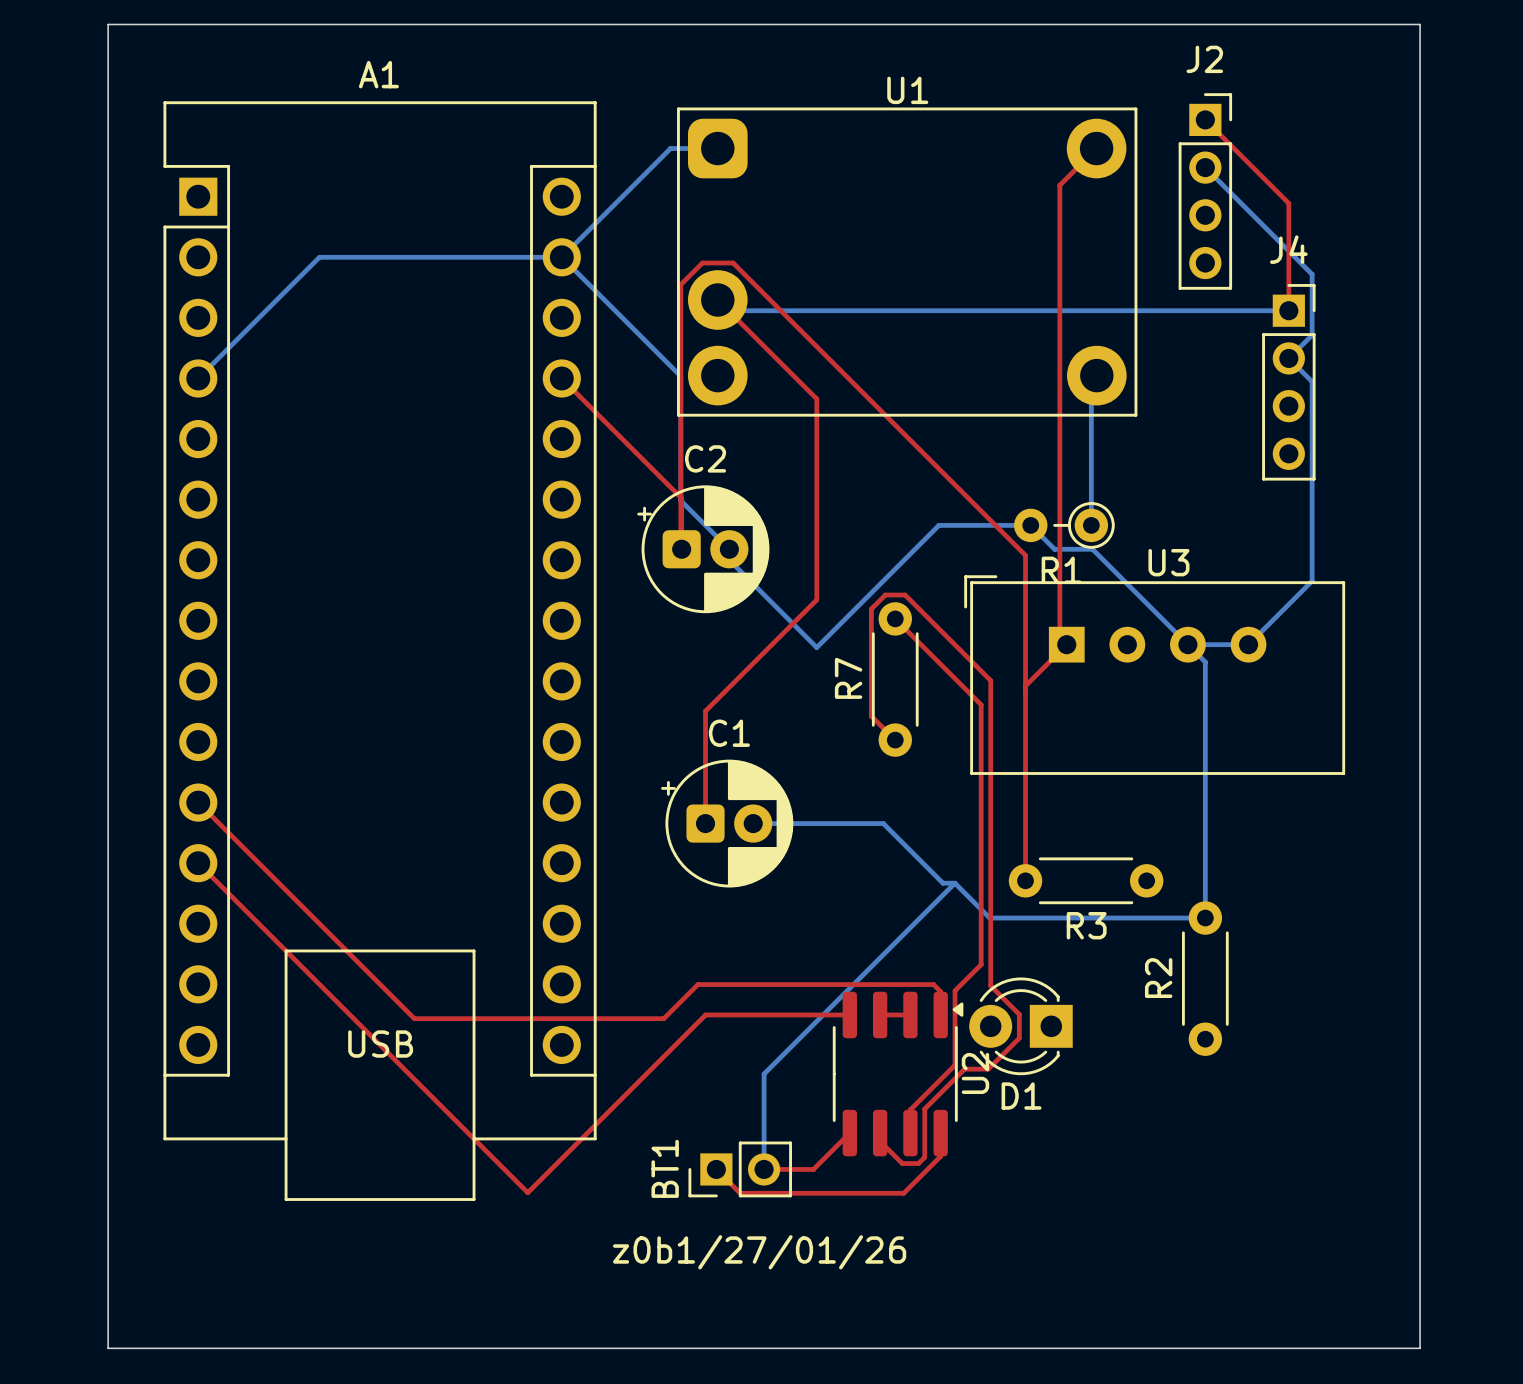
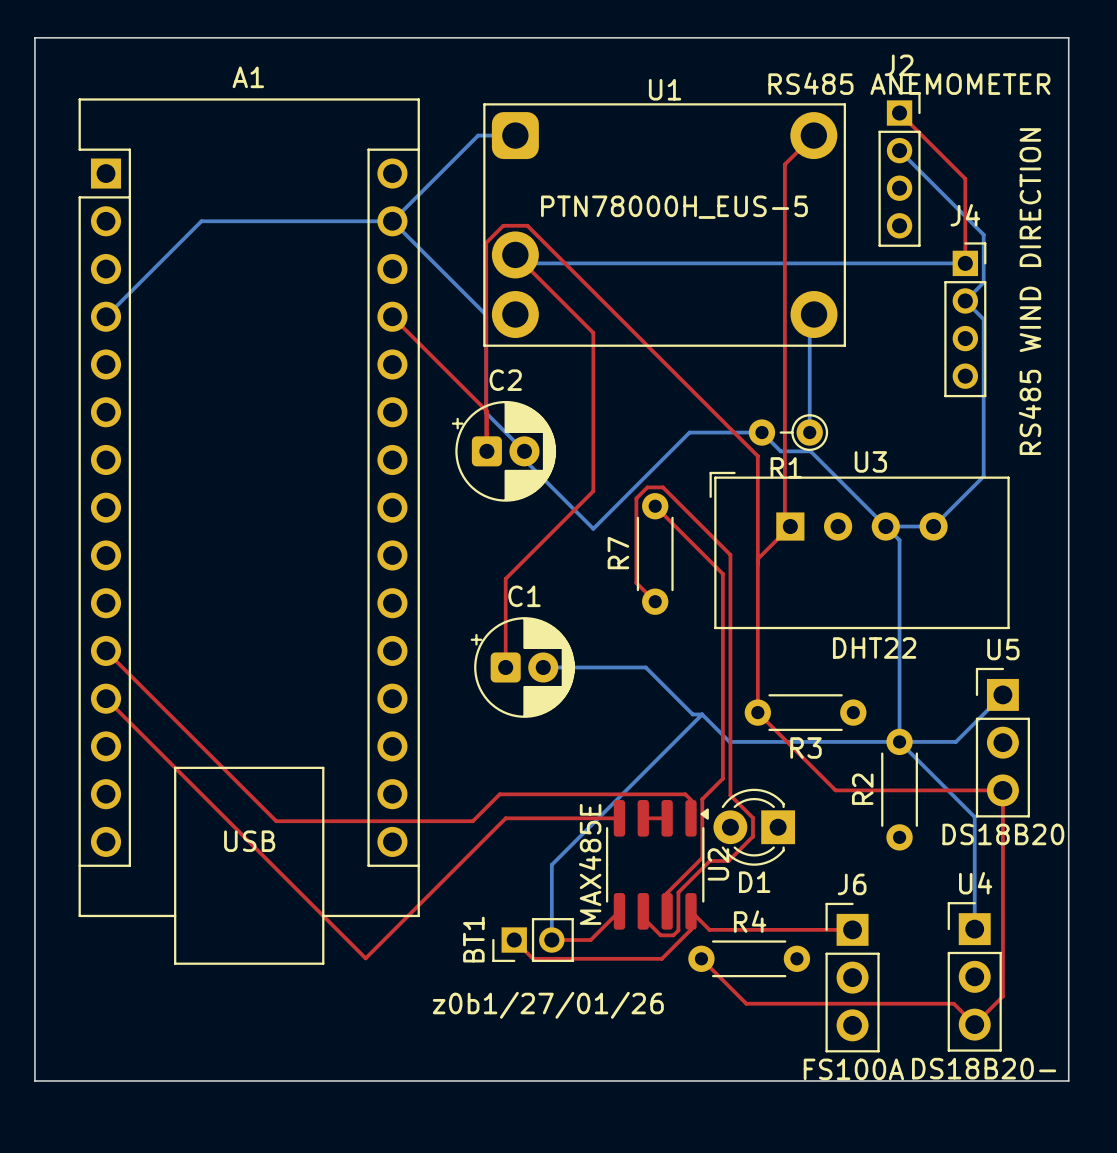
J2 value: none -> RS485 ANEMOMETER (909, 83)
U1 value: none -> PTN78000H_EUS-5 (674, 207)
J4 value: none -> RS485 WIND DIRECTION (1029, 291)
U3 value: none -> DHT22 (874, 647)
bottom track: none -> (1002, 694) (955, 741) (899, 741) (974, 817) (974, 929)
top track: none -> (757, 712) (835, 790) (1002, 790) (1002, 996) (974, 1024) (953, 1003) (746, 1003) (701, 958)
U5: none -> DS18B20 (1002, 742)
U2 value: none -> MAX485E (590, 864)
top track: none -> (691, 911) (709, 929) (852, 929)
R4: none -> (749, 958)
U4: none -> DS18B20- (974, 976)
J6: none -> FS100A (852, 977)

